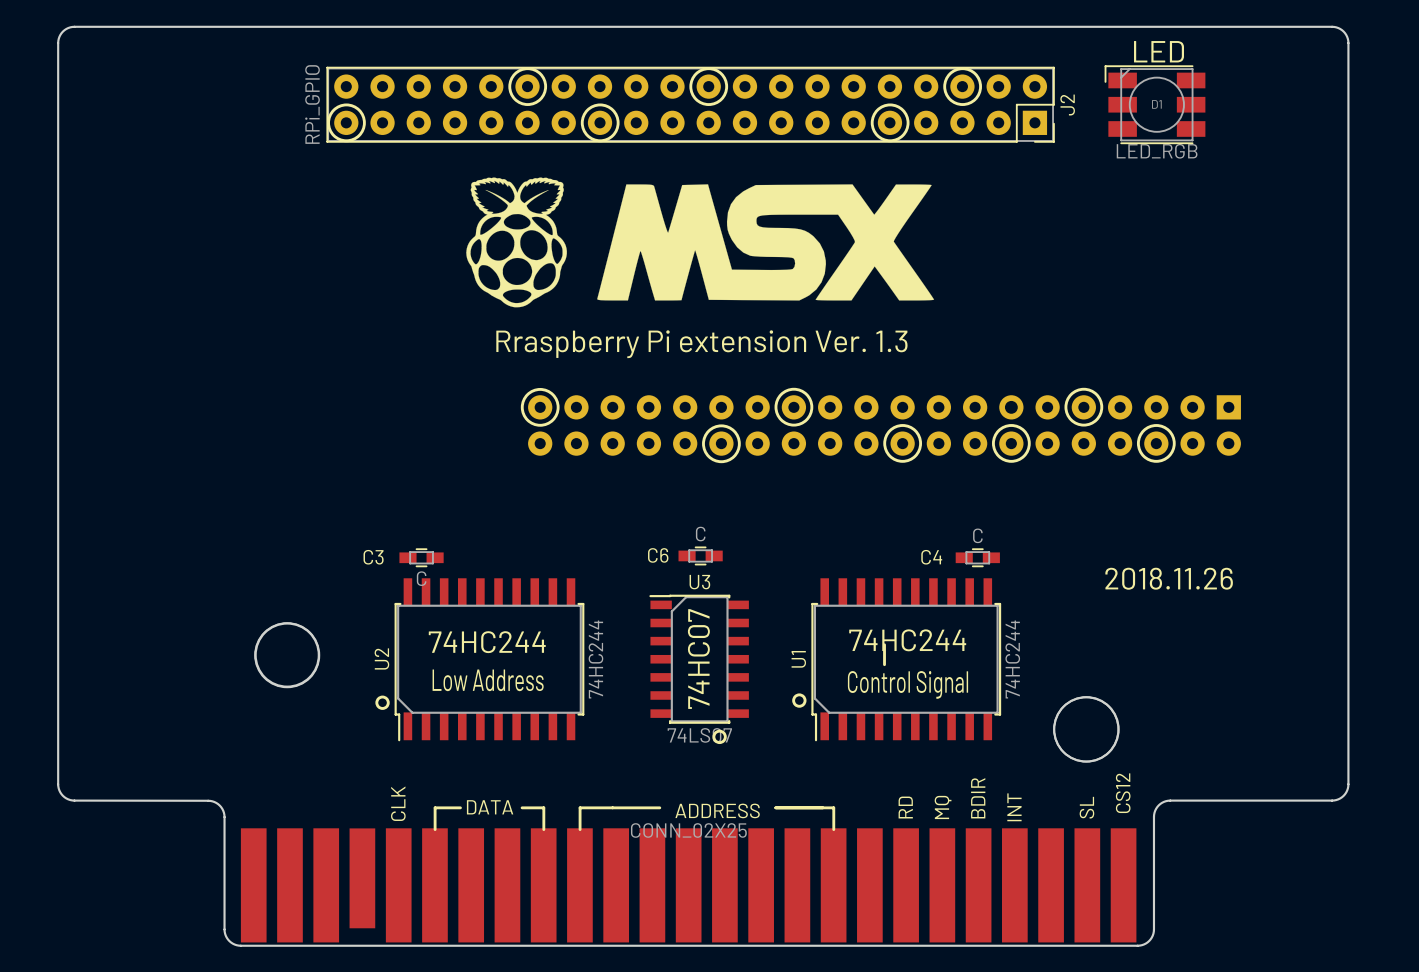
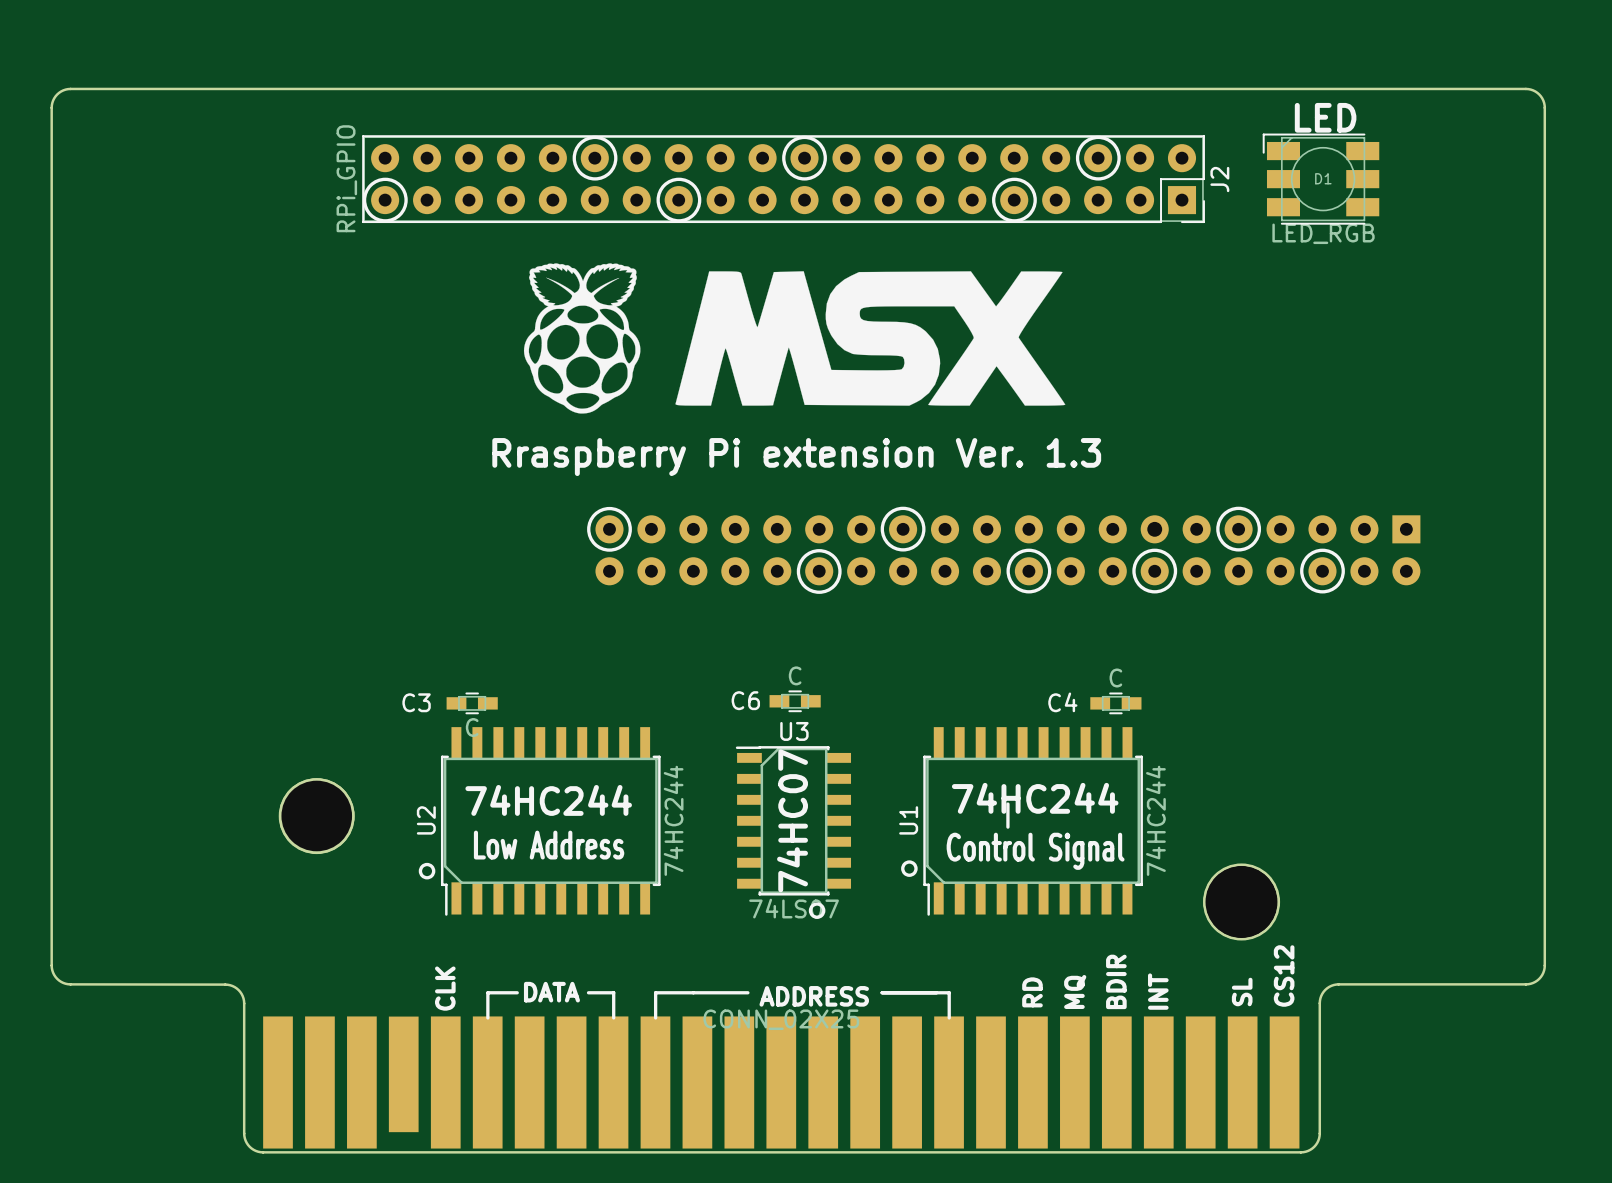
text: 2018.11.26 (1169, 578) -> none

